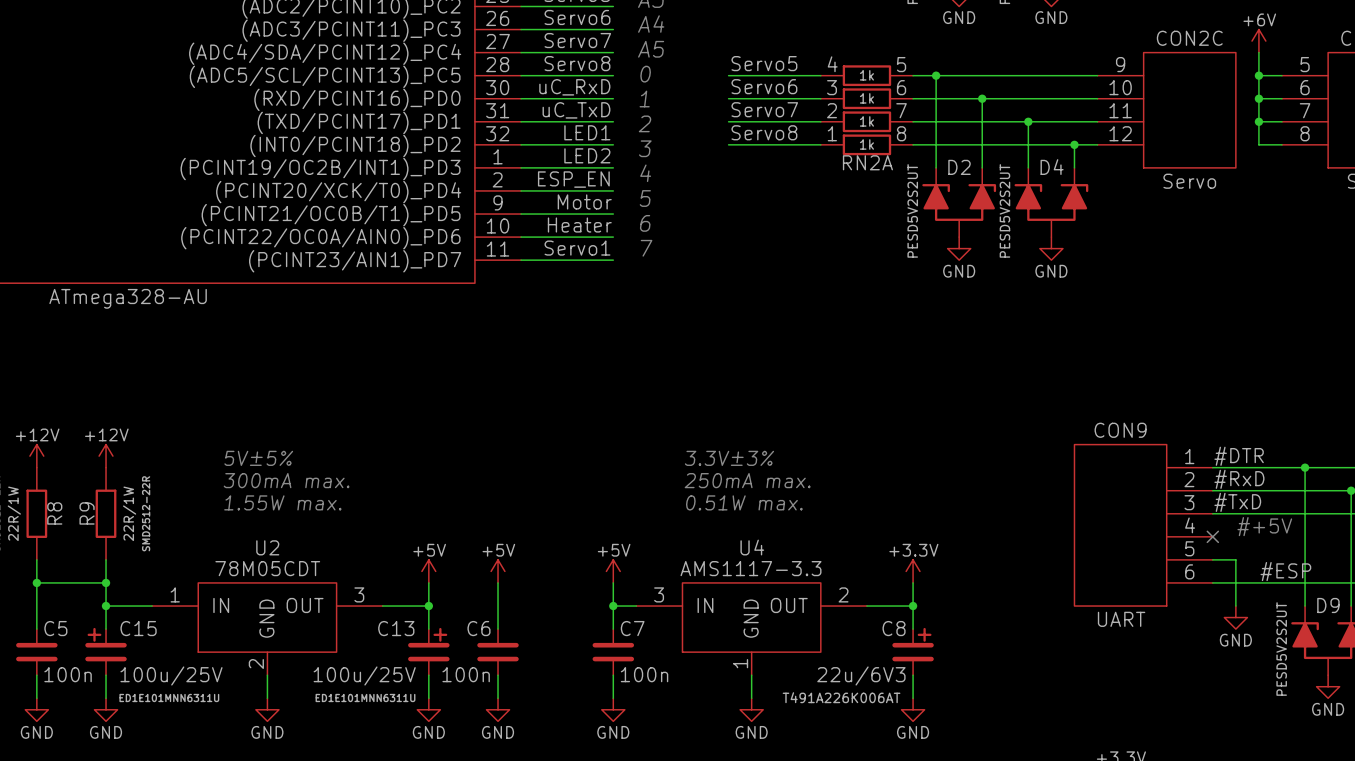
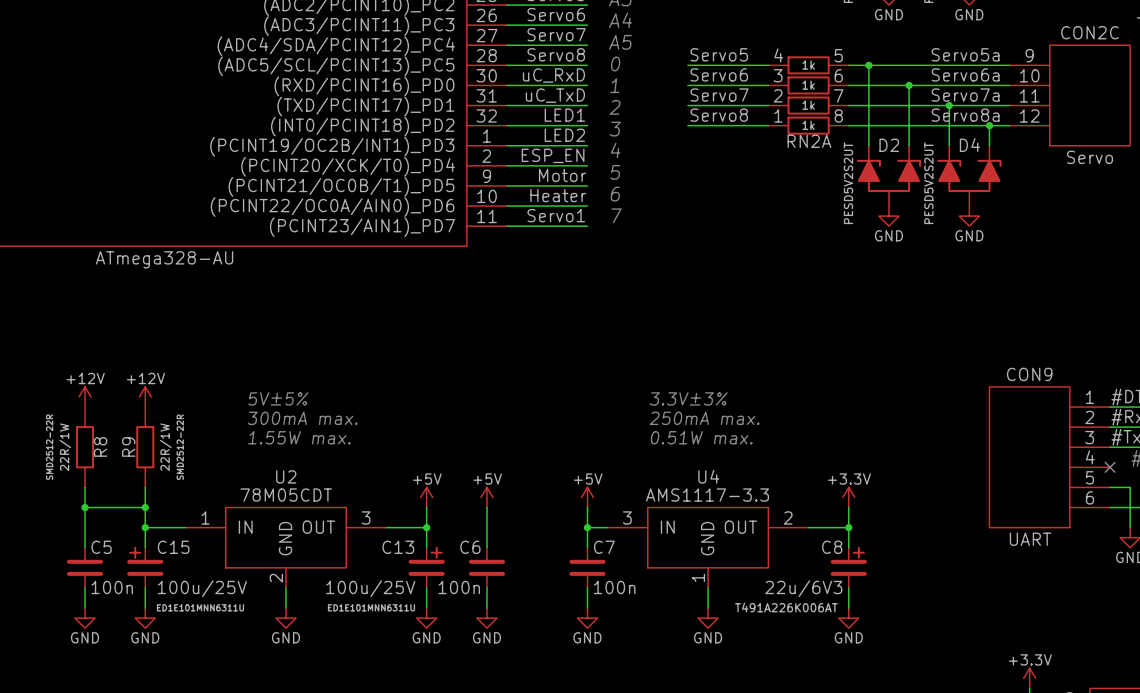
label: none -> Servo5a (965, 54)
label: none -> Servo6a (965, 74)
label: none -> Servo7a (965, 95)
label: none -> Servo8a (965, 115)

